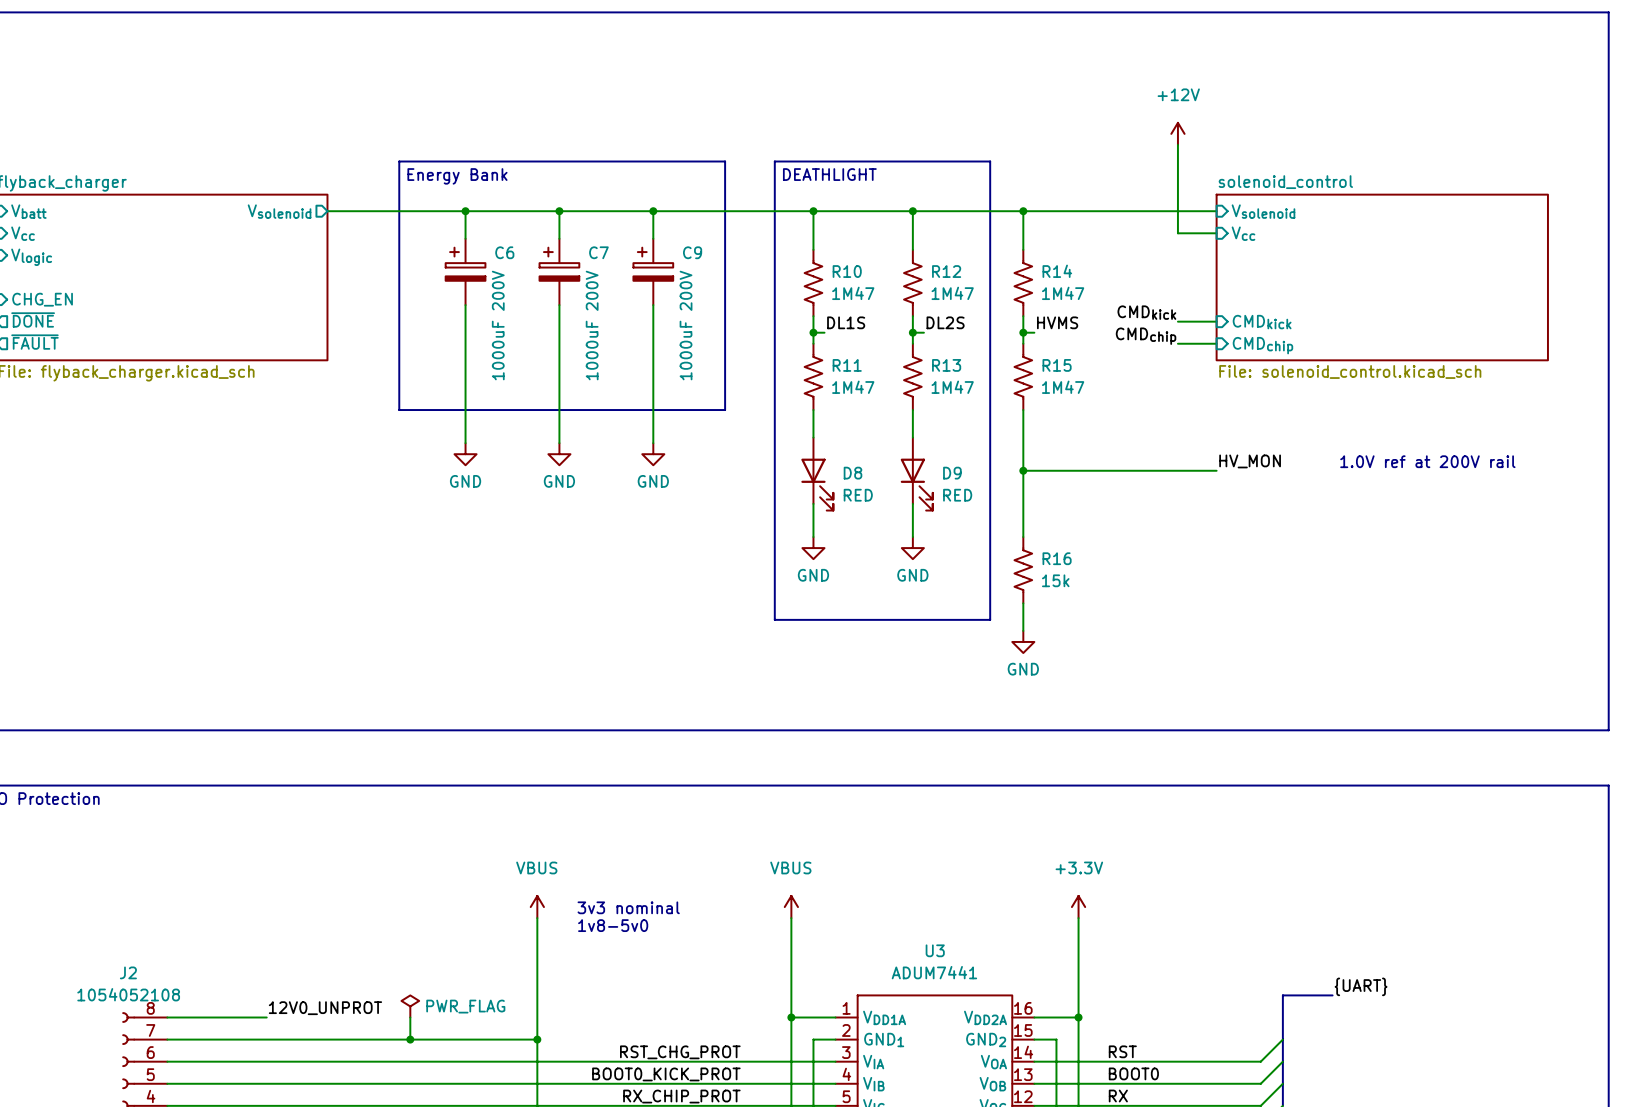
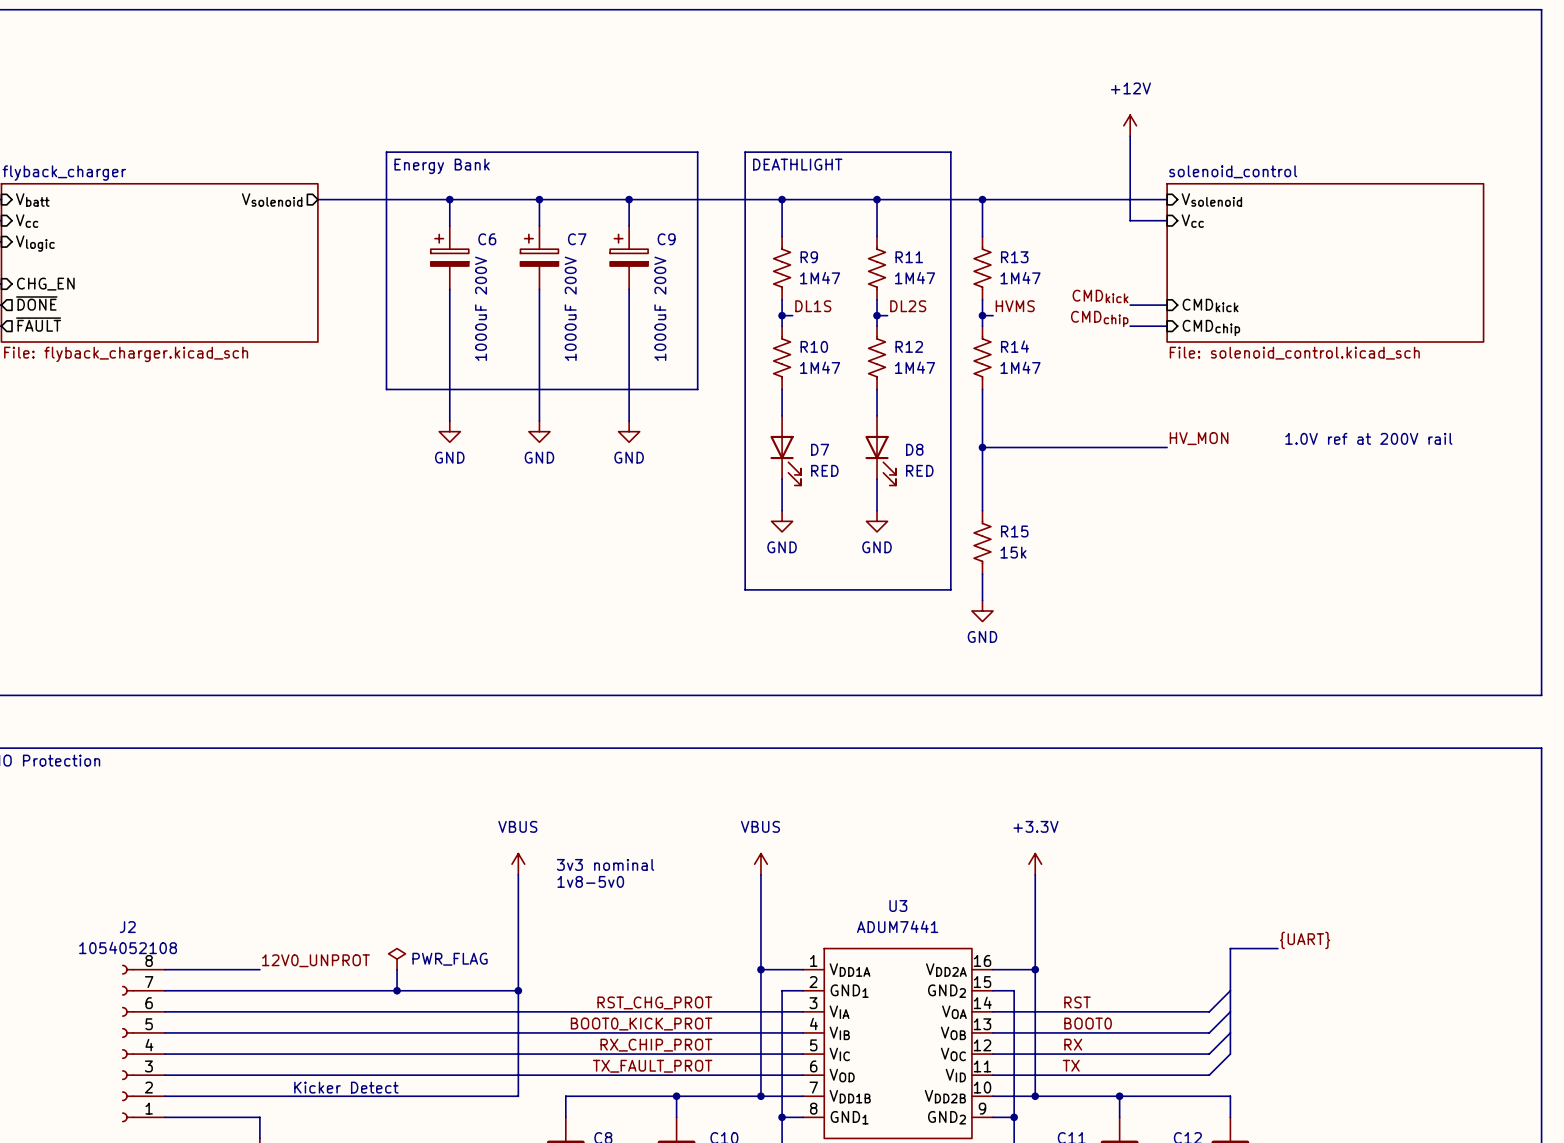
R10 name: R10 (847, 271) -> R9 (809, 257)
R12 name: R12 (946, 271) -> R11 (909, 257)
R14 name: R14 (1057, 271) -> R13 (1014, 257)
R11 name: R11 (847, 365) -> R10 (814, 346)
R13 name: R13 (946, 365) -> R12 (909, 346)
R15 name: R15 (1057, 365) -> R14 (1014, 346)
D8 name: D8 (852, 473) -> D7 (820, 449)
D9 name: D9 (952, 473) -> D8 (914, 449)
R16 name: R16 (1057, 558) -> R15 (1014, 531)

